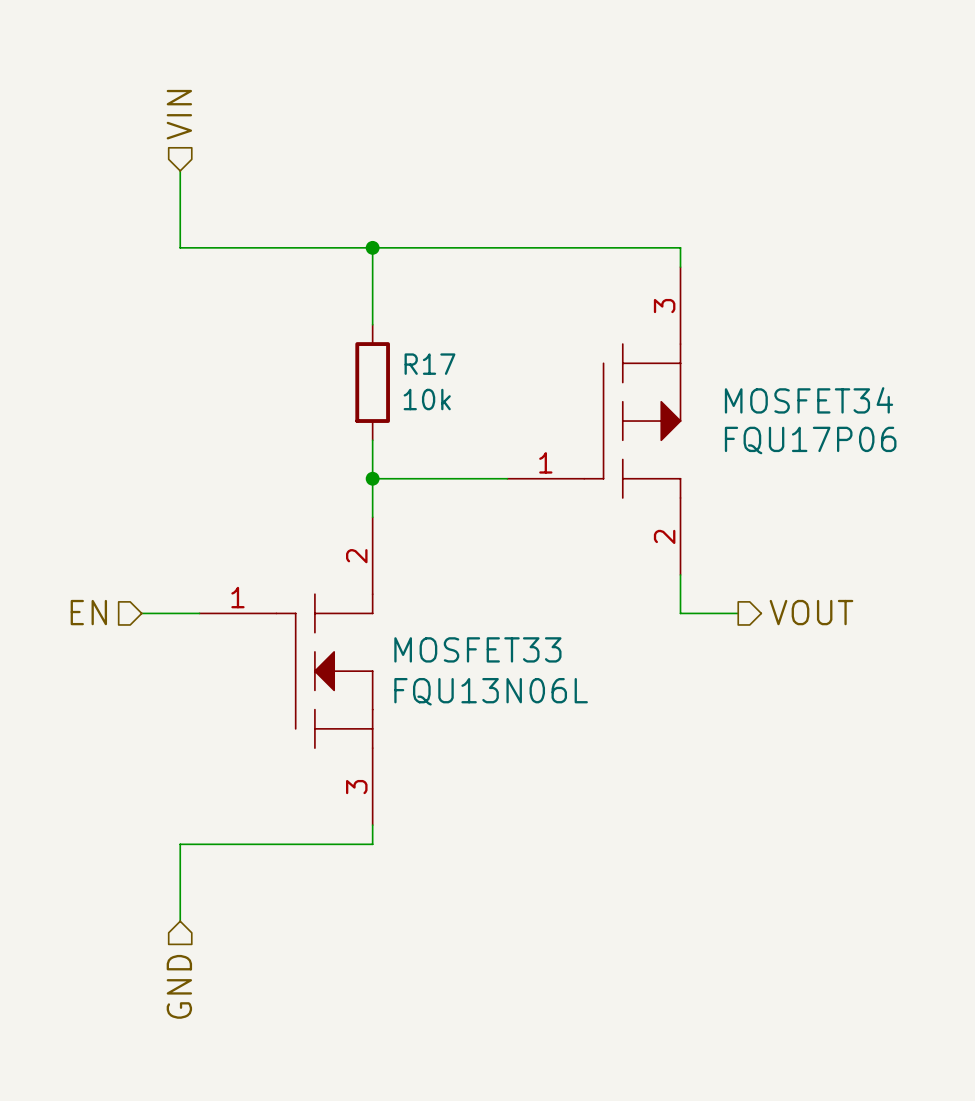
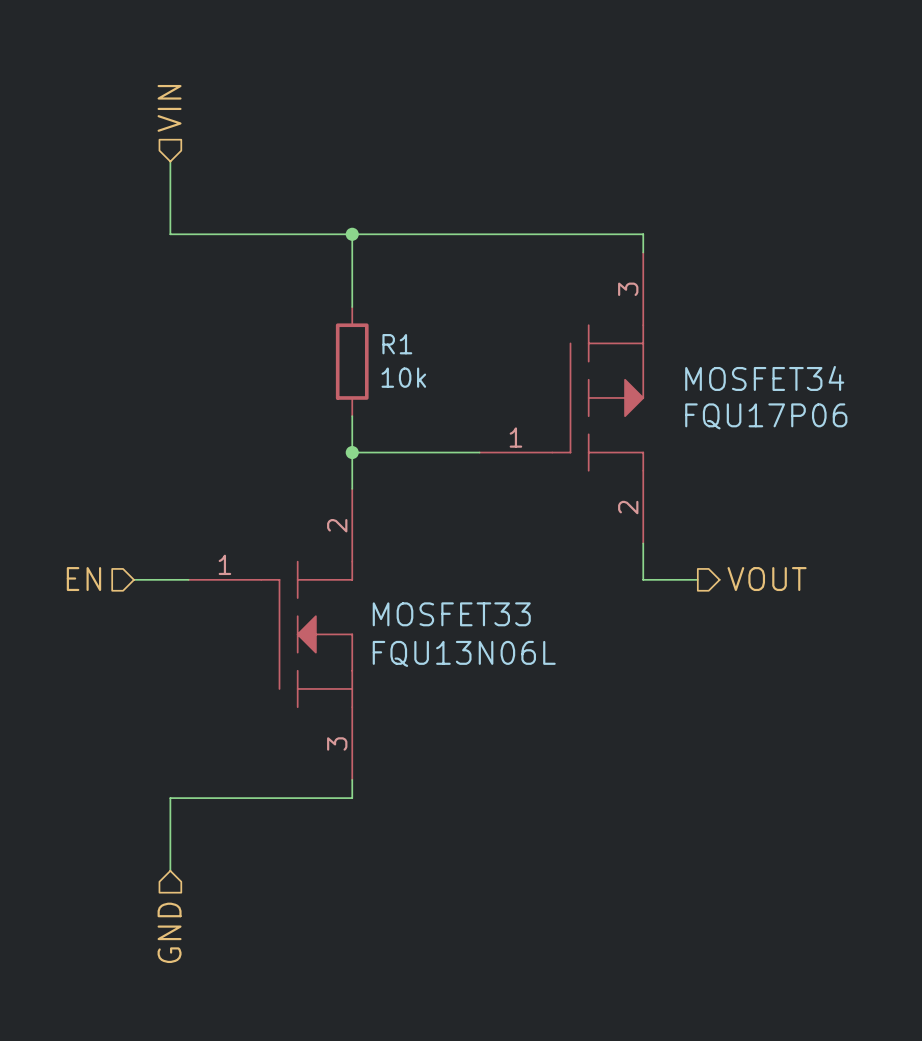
R17 name: R17 (429, 364) -> R1 (397, 344)

